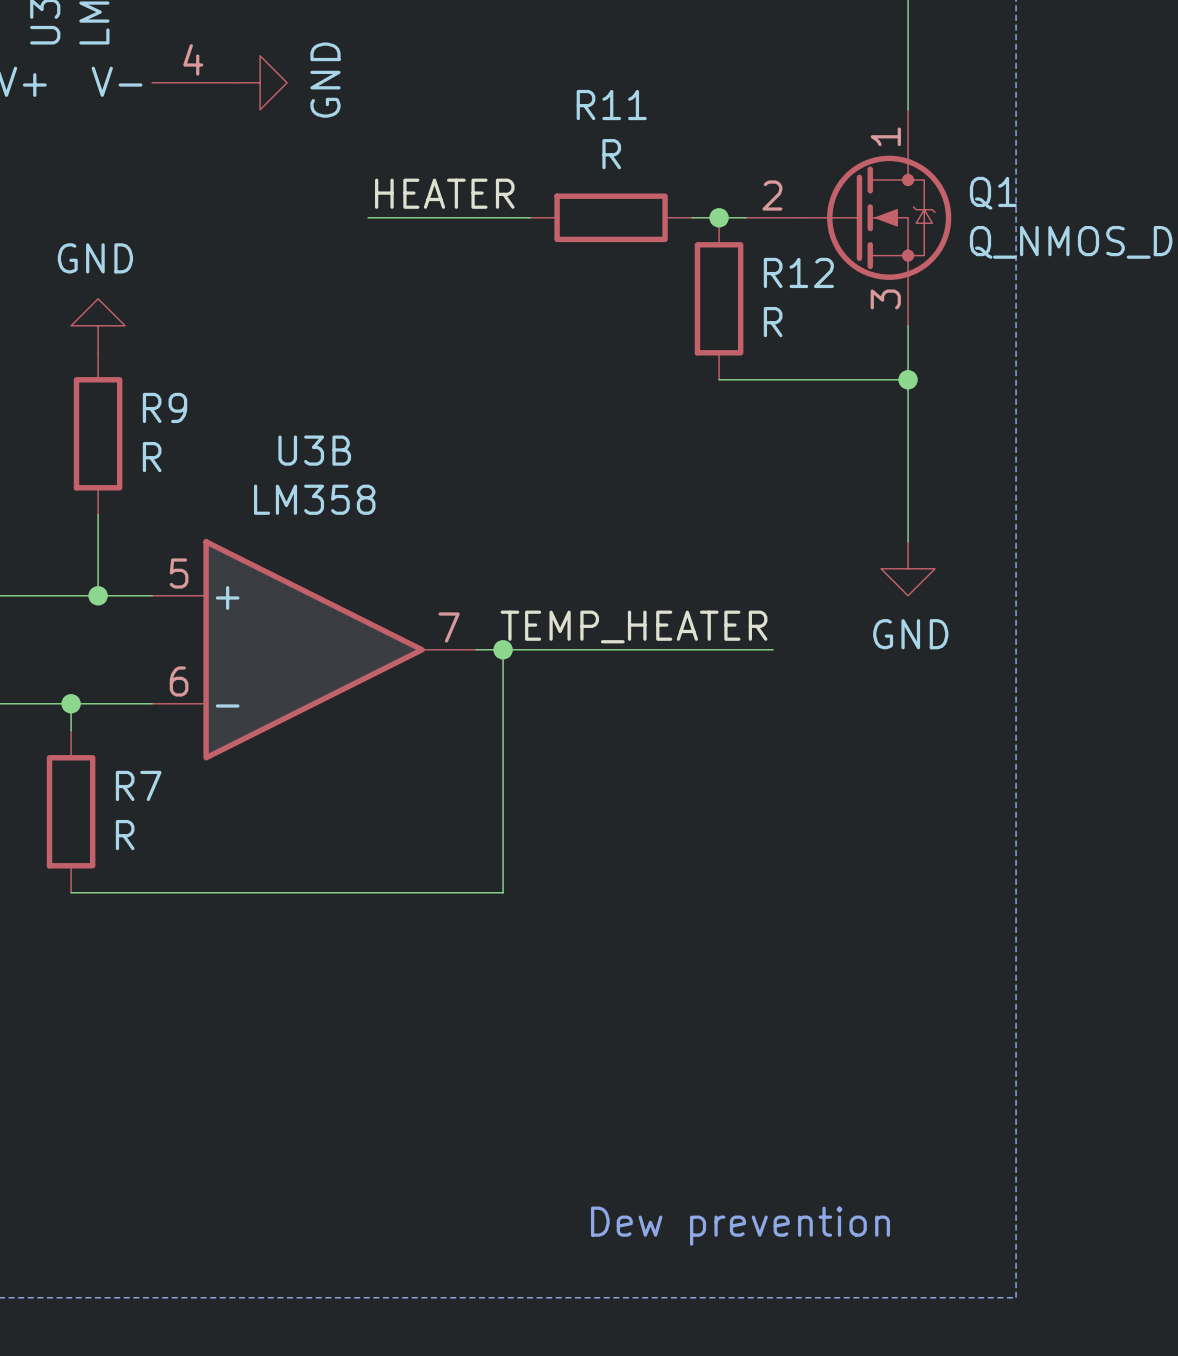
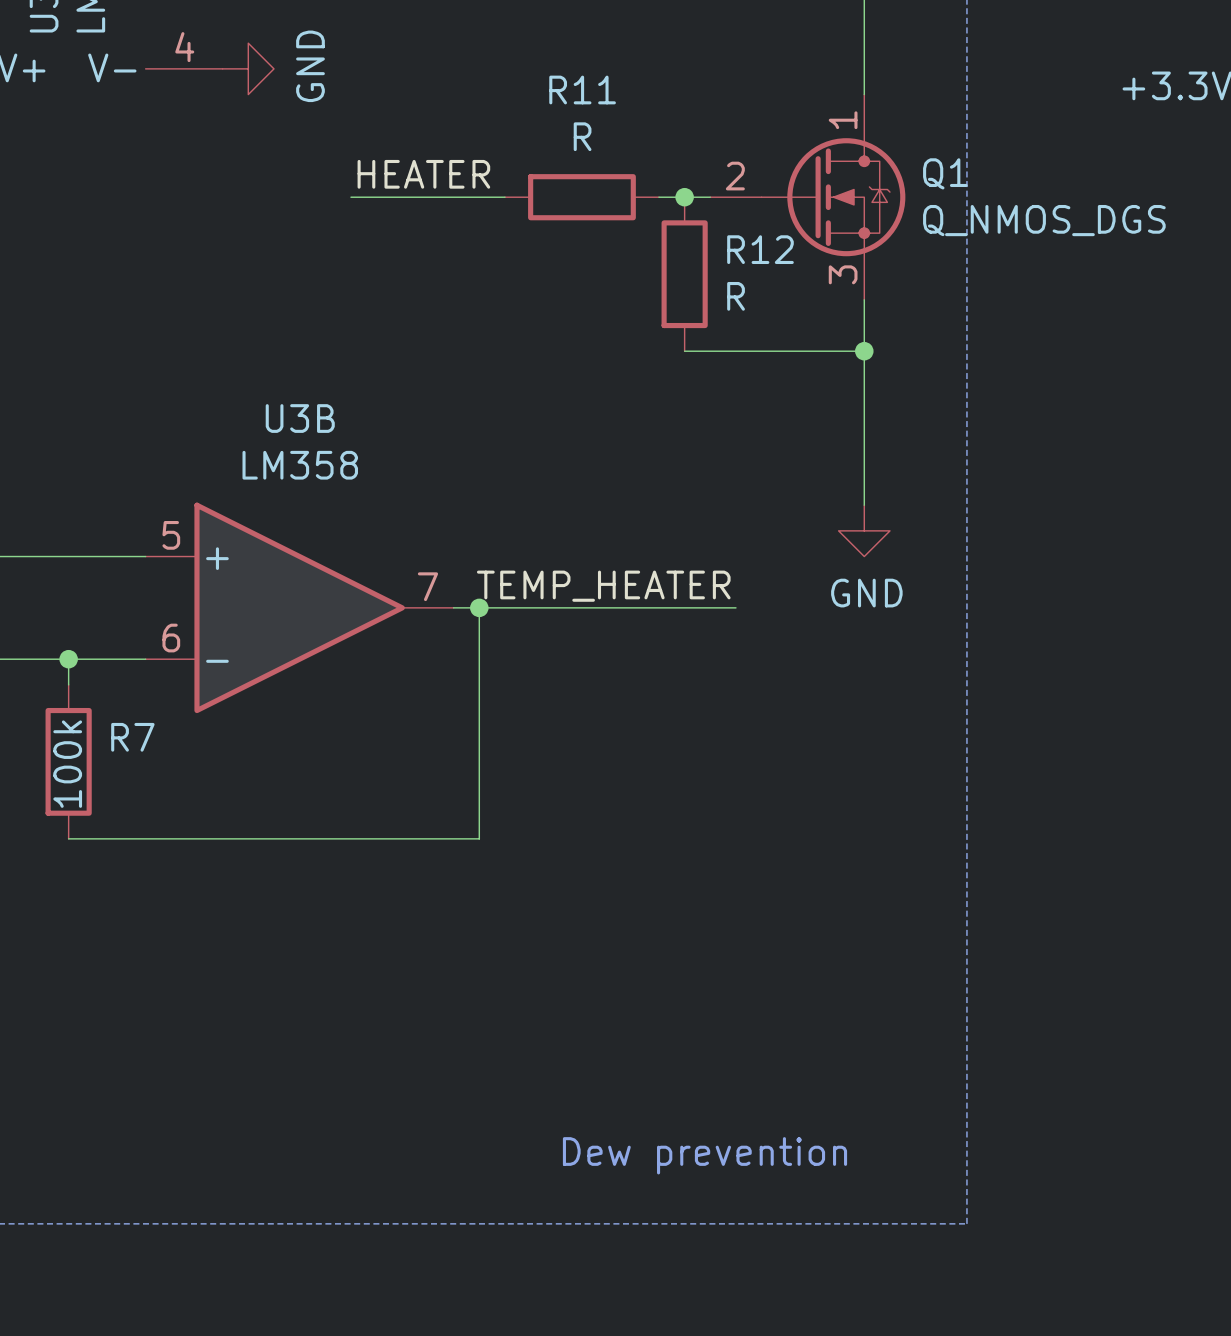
power symbol: GND (98, 325) -> none
R9: R (98, 433) -> none
wire: (98, 514) (98, 595) -> none
junction: (98, 595) -> none
R7 value: R (125, 835) -> 100k (67, 764)

